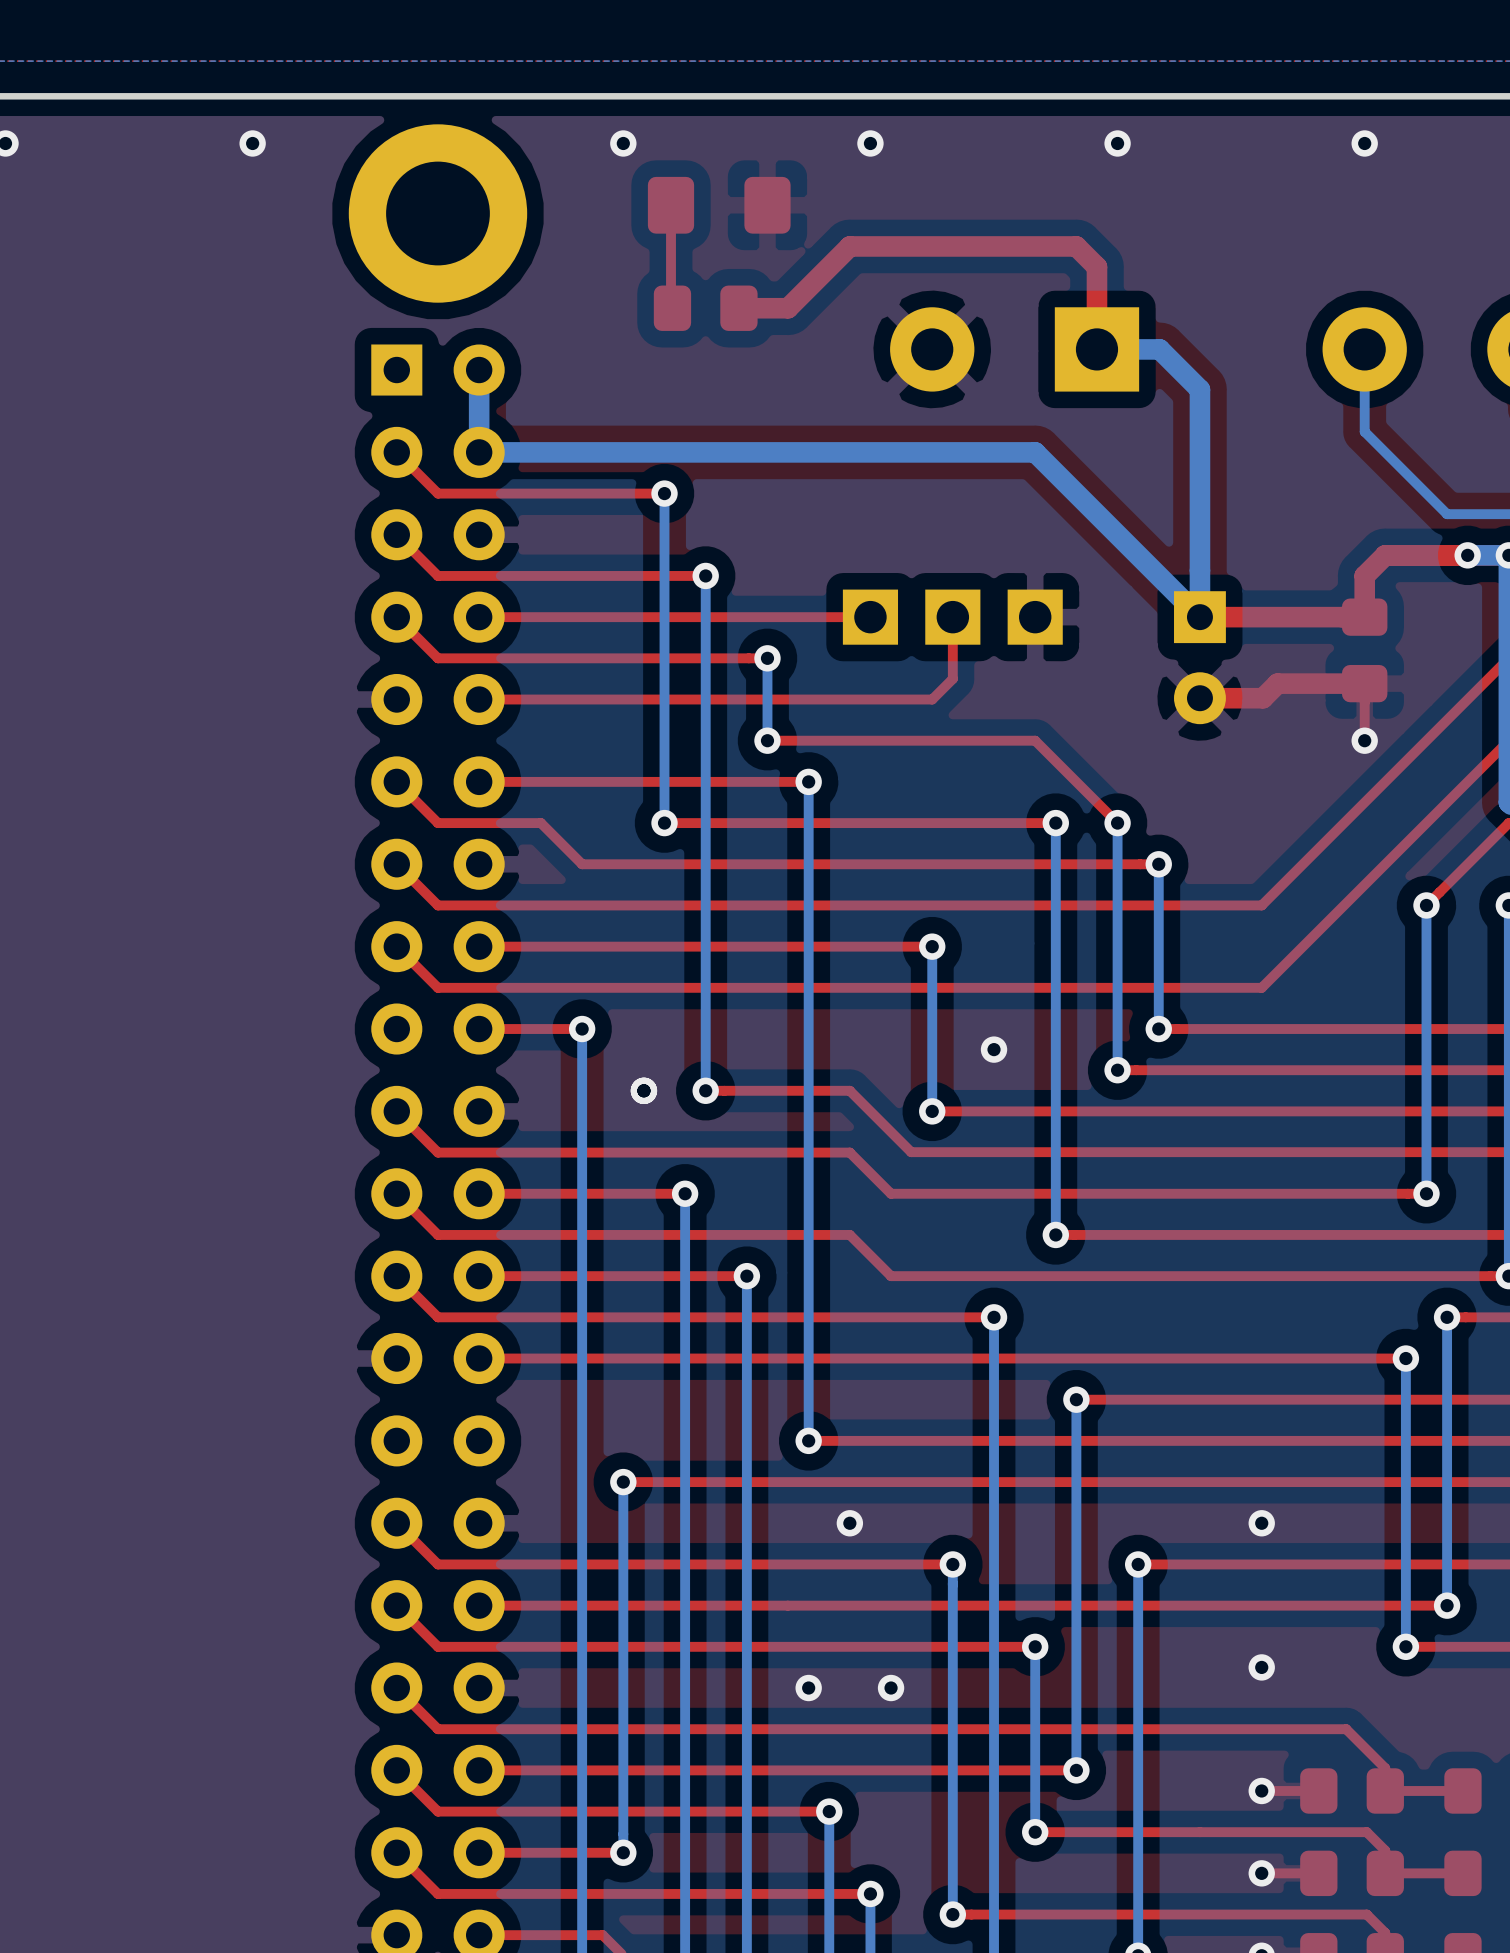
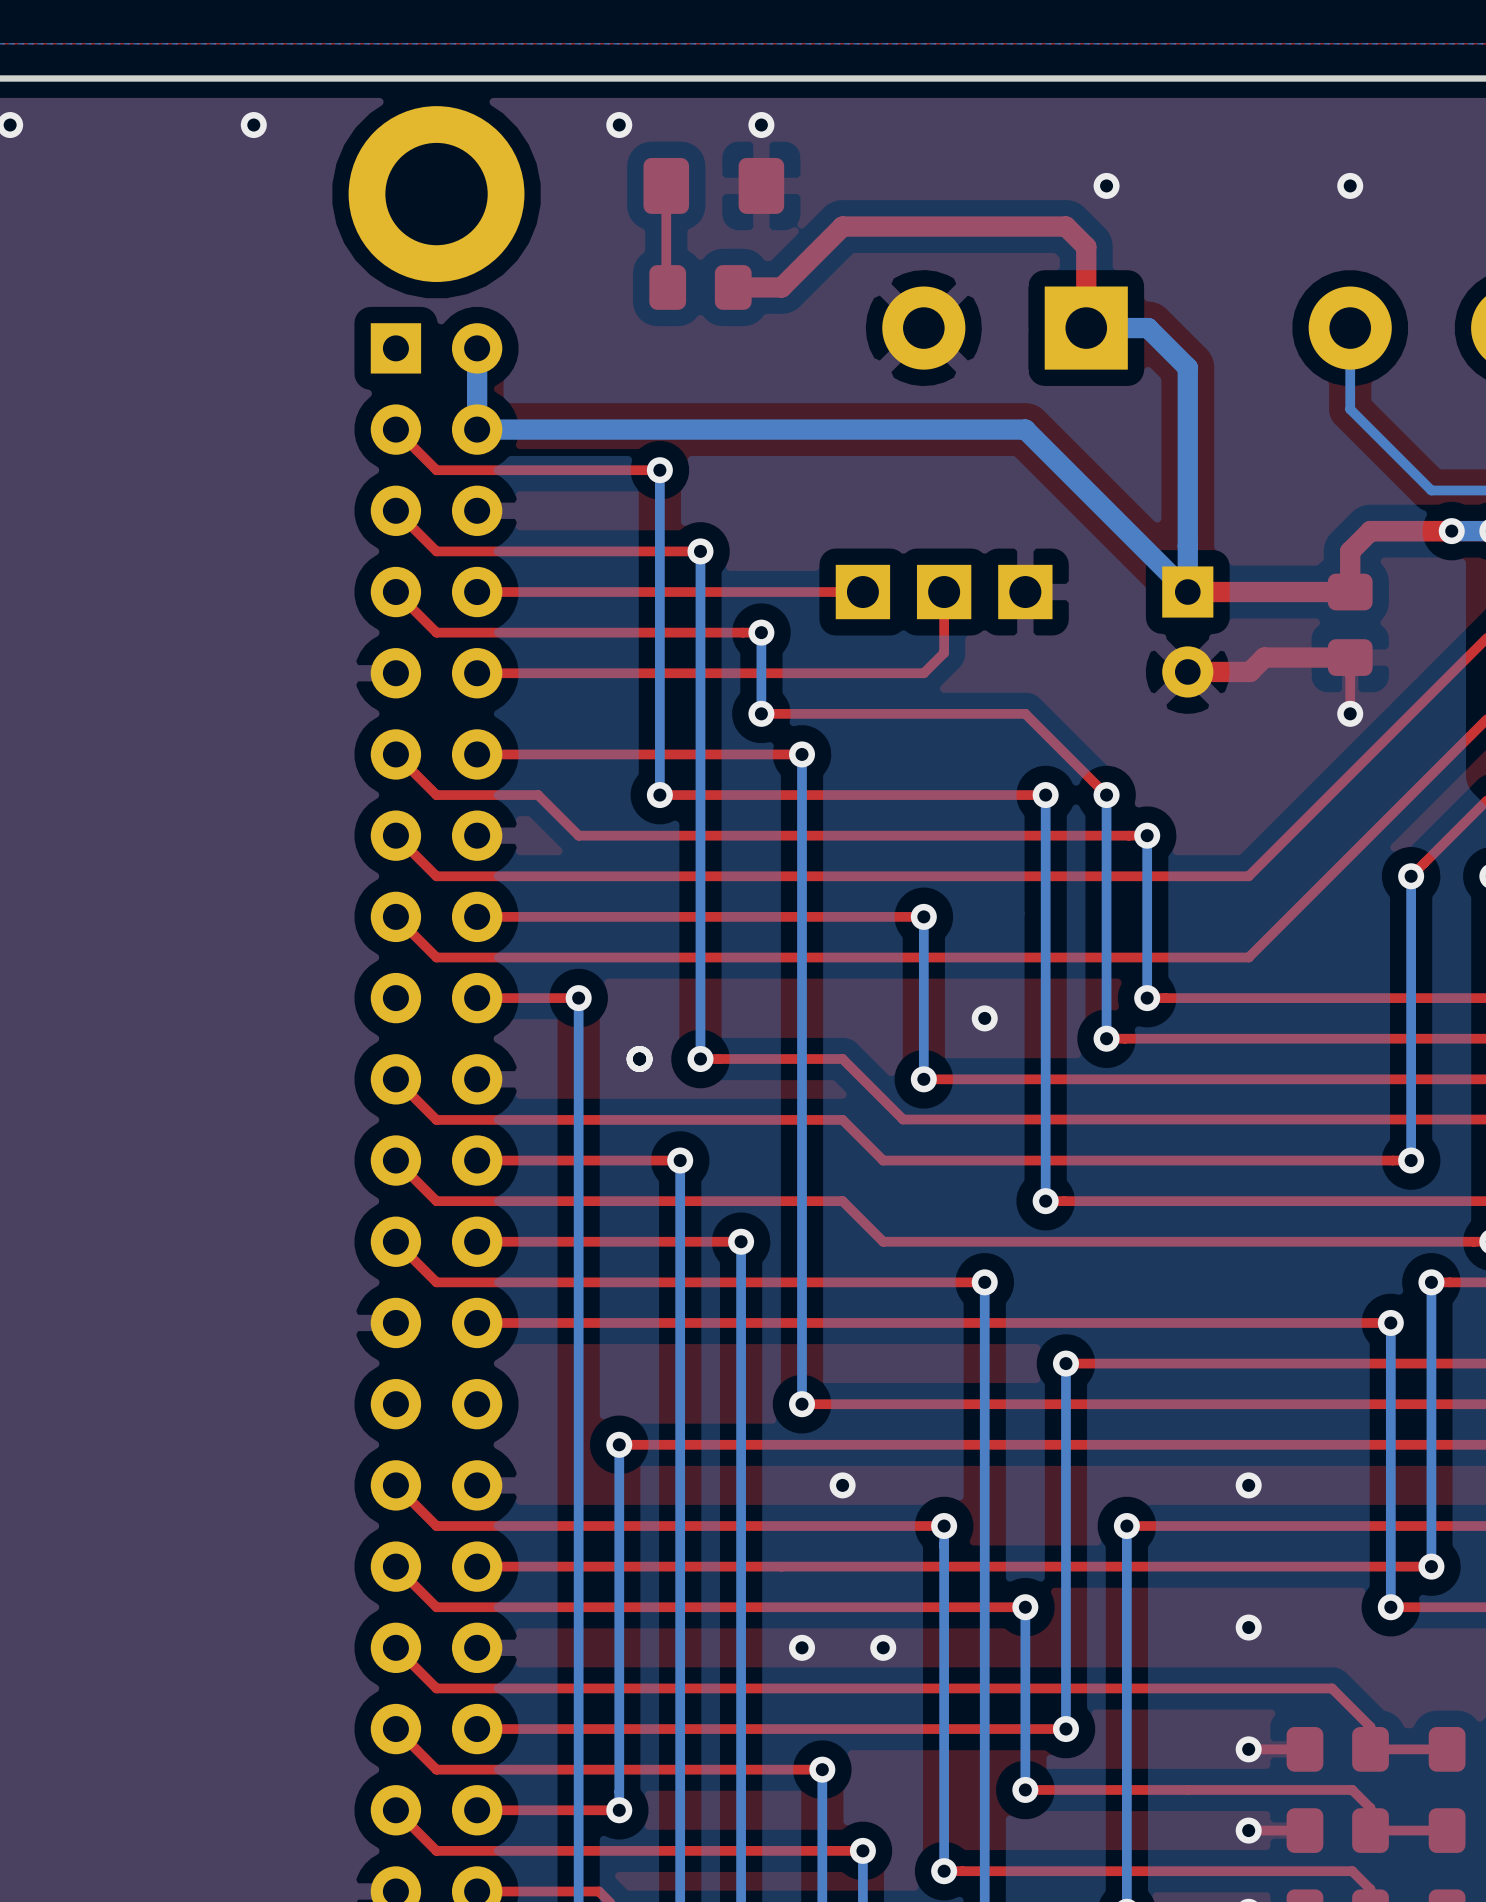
via position: (870, 143) -> (761, 125)
via position: (1117, 143) -> (1106, 185)
via position: (1364, 143) -> (1350, 185)

